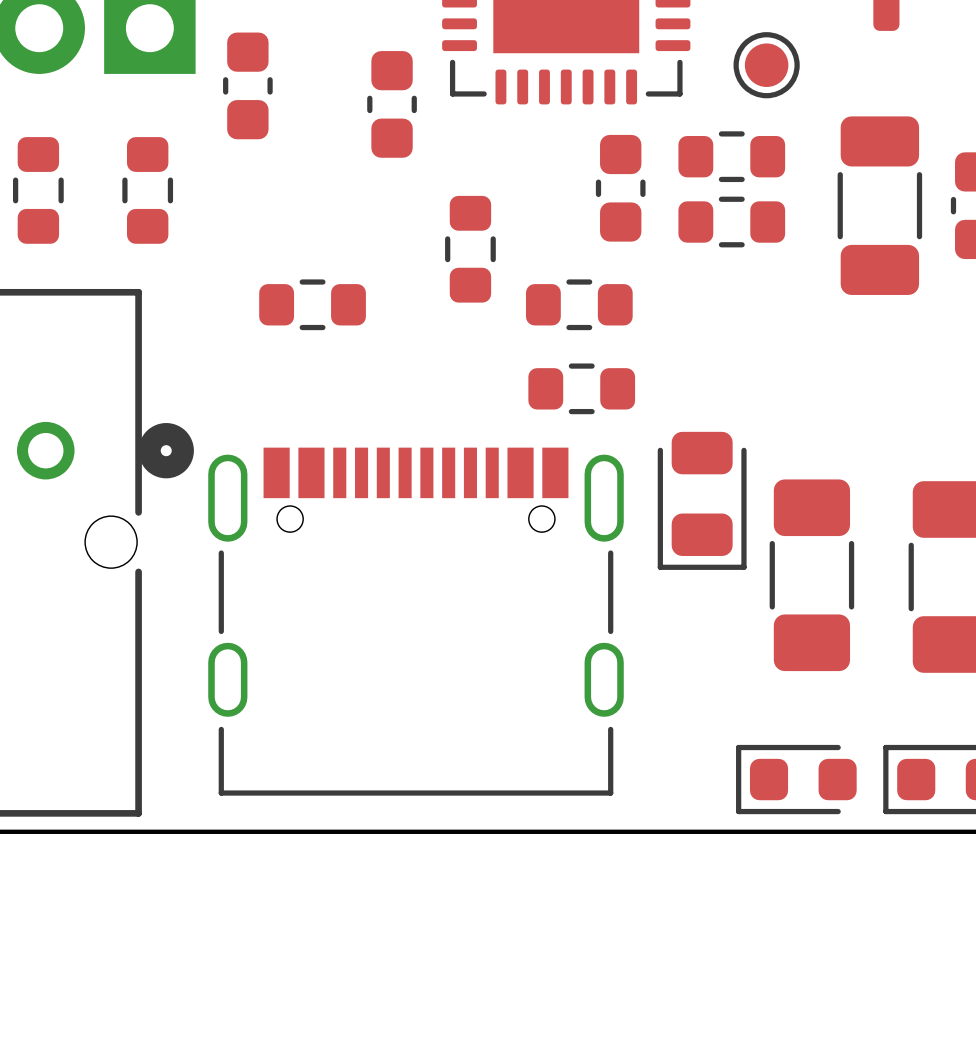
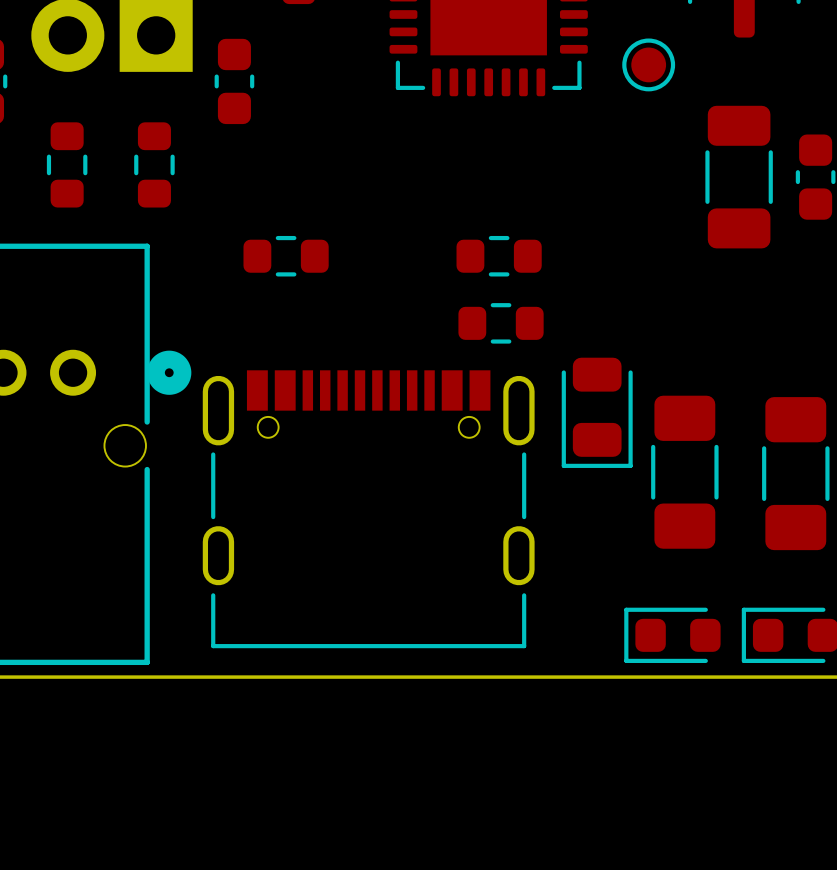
part: (392, 104) -> none
part: (731, 156) -> none
part: (620, 188) -> none
part: (731, 222) -> none
part: (470, 249) -> none

